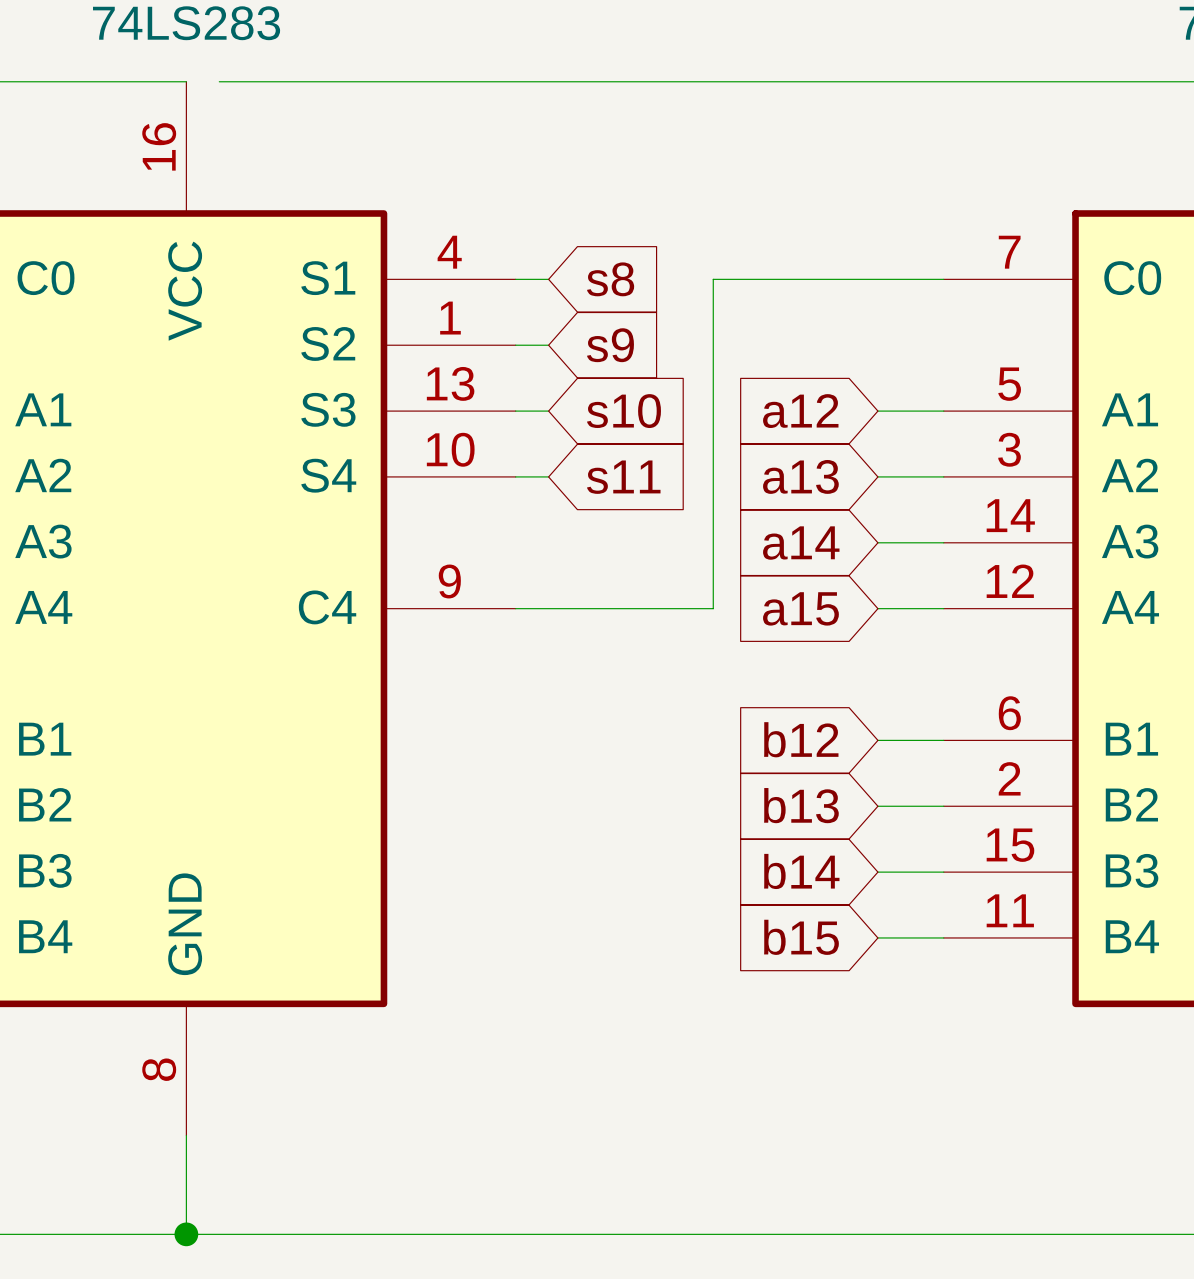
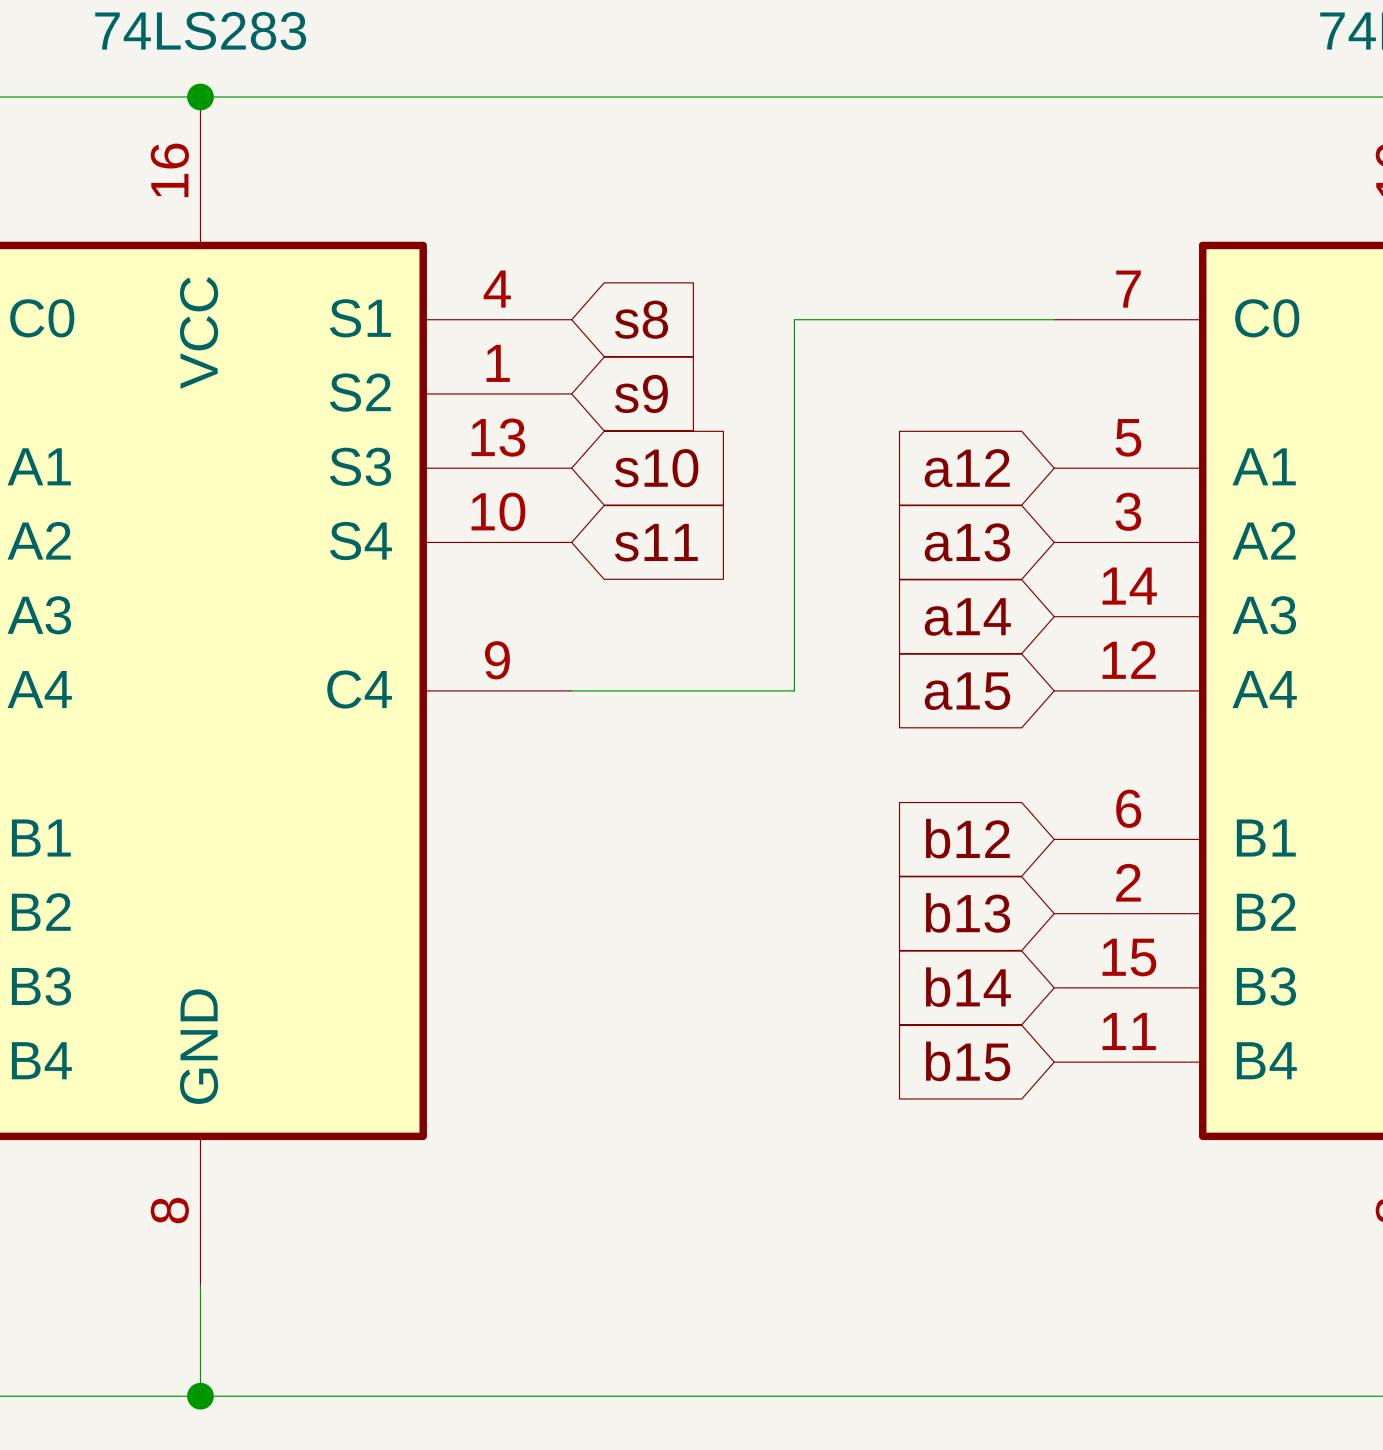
junction: none -> (200, 97)
wire: (515, 279) (548, 279) -> (200, 97) (237, 97)
global label position: s8 (610, 279) -> s8 (641, 319)
wire: (515, 345) (548, 345) -> none
global label position: s9 (610, 345) -> s9 (641, 393)
wire: (515, 411) (548, 411) -> none
global label position: s10 (623, 411) -> s10 (656, 468)
global label position: a12 (800, 411) -> a12 (967, 468)
wire: (877, 411) (943, 411) -> none
wire: (515, 476) (548, 476) -> none
global label position: a13 (800, 476) -> a13 (967, 542)
wire: (877, 476) (943, 476) -> none
global label position: s11 (623, 477) -> s11 (656, 542)
wire: (877, 542) (943, 542) -> none
global label position: a14 (801, 543) -> a14 (967, 616)
global label position: a15 (800, 608) -> a15 (967, 691)
wire: (877, 608) (943, 608) -> none
global label position: b12 (801, 739) -> b12 (967, 838)
wire: (877, 740) (943, 740) -> none
global label position: b13 (801, 805) -> b13 (968, 912)
wire: (877, 806) (943, 806) -> none
global label position: b14 (801, 871) -> b14 (968, 987)
wire: (877, 872) (943, 872) -> none
global label position: b15 (801, 937) -> b15 (968, 1061)
wire: (877, 937) (943, 937) -> none

